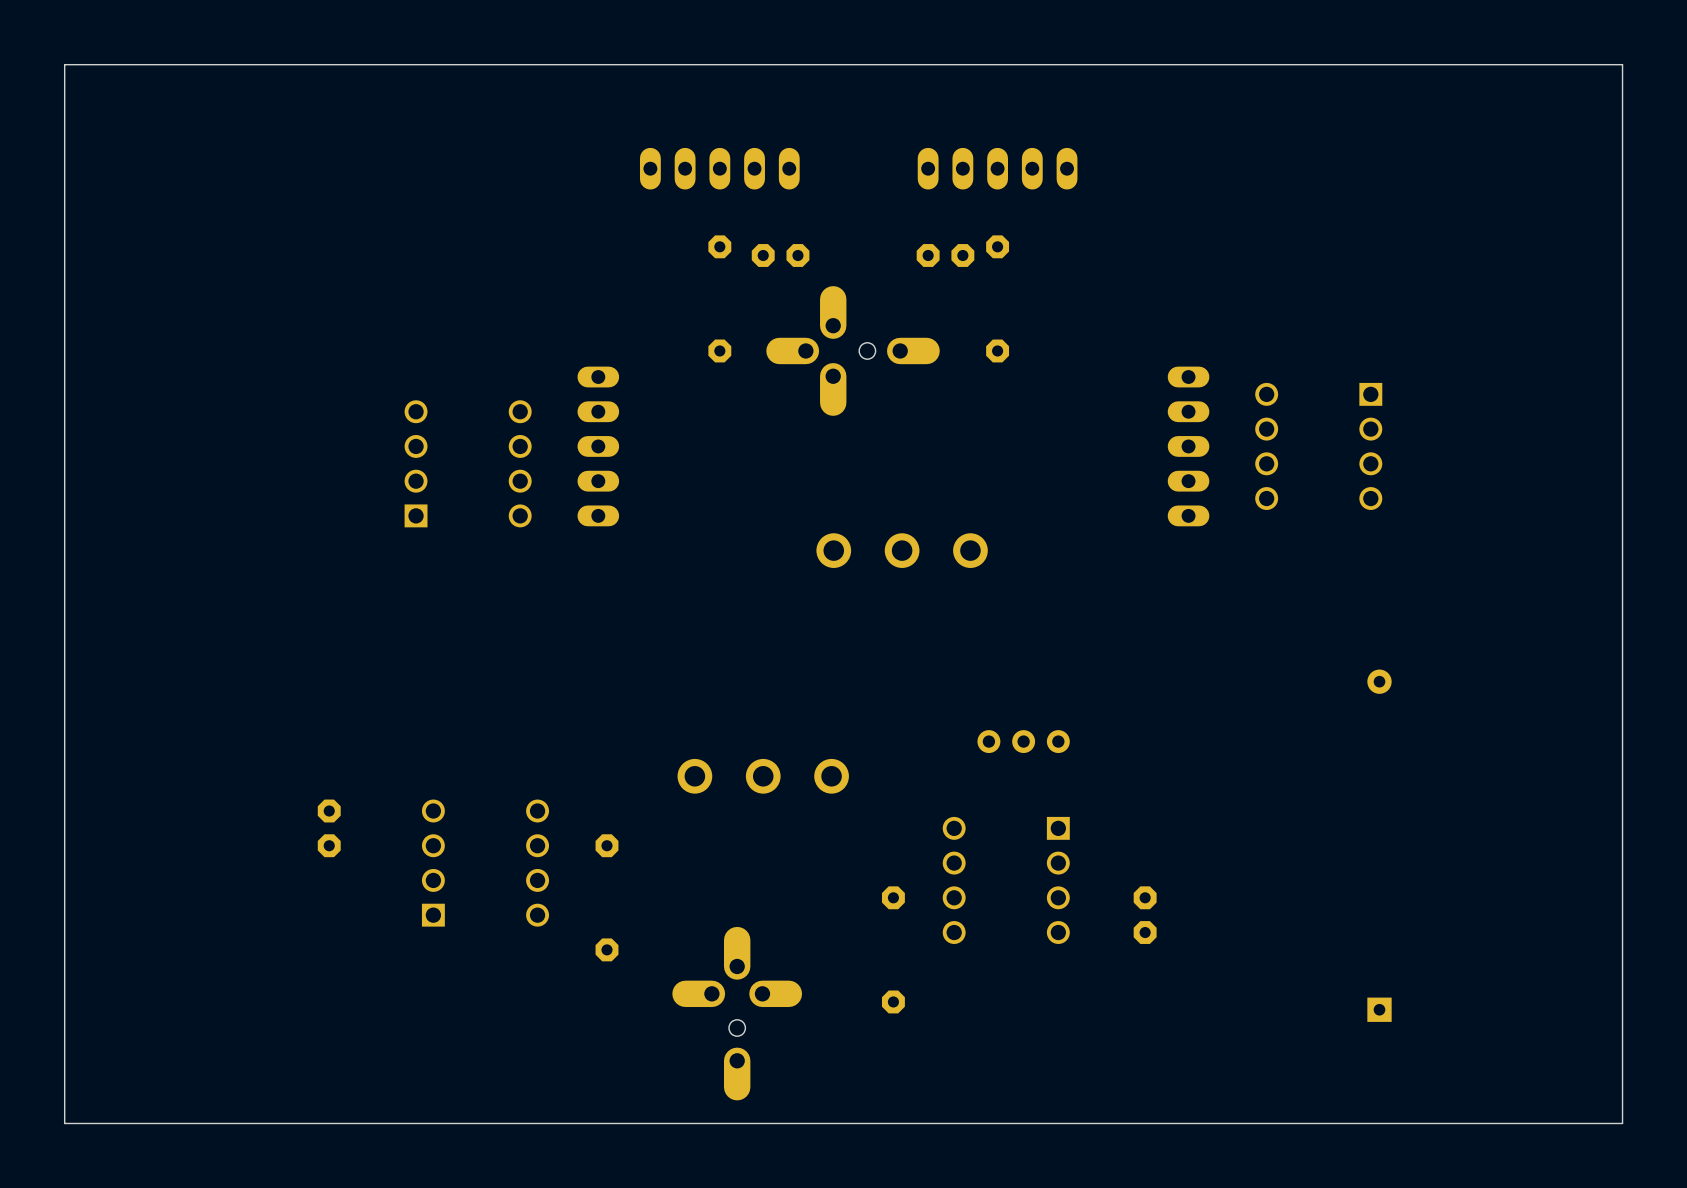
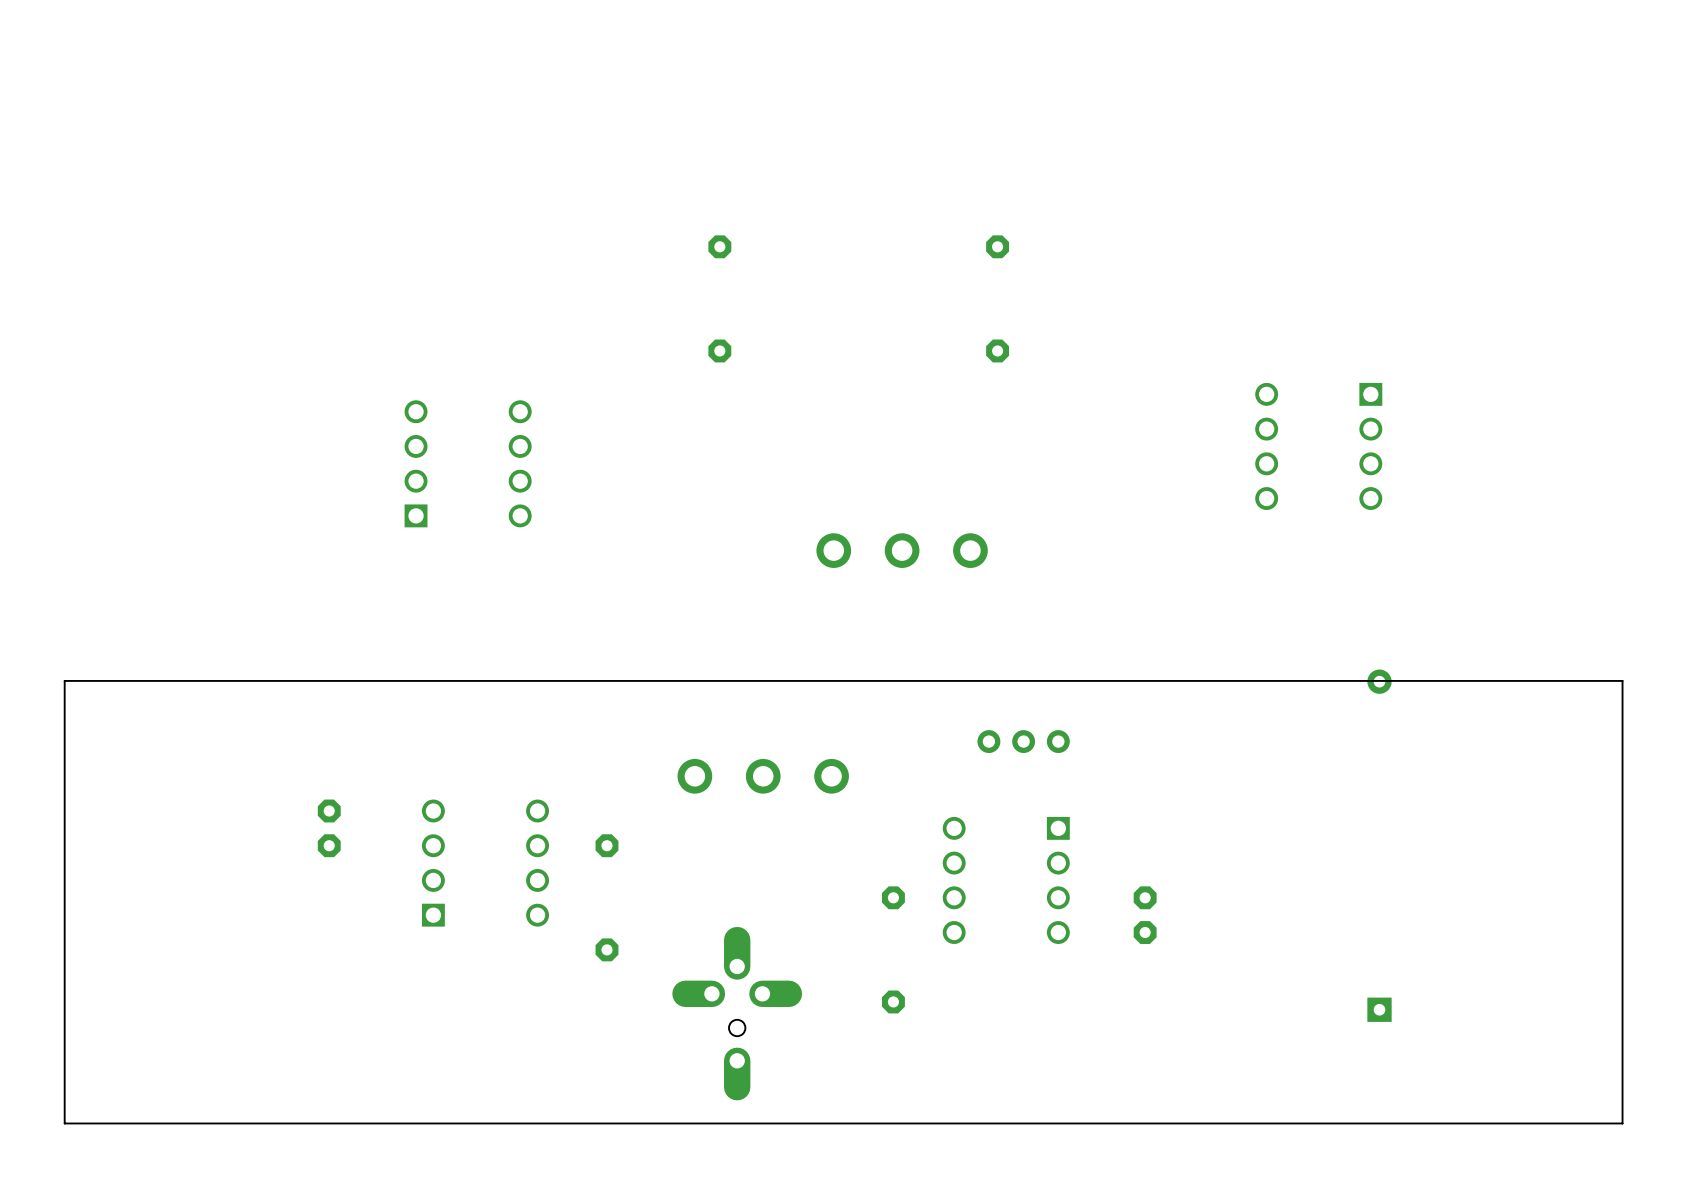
part: (719, 168) -> none
part: (997, 168) -> none
part: (780, 255) -> none
part: (945, 255) -> none
part: (853, 350) -> none
part: (598, 446) -> none
part: (1188, 446) -> none
board edge: (1622, 680) (1622, 64) (64, 64) (64, 680) -> (1622, 680) (64, 680)

